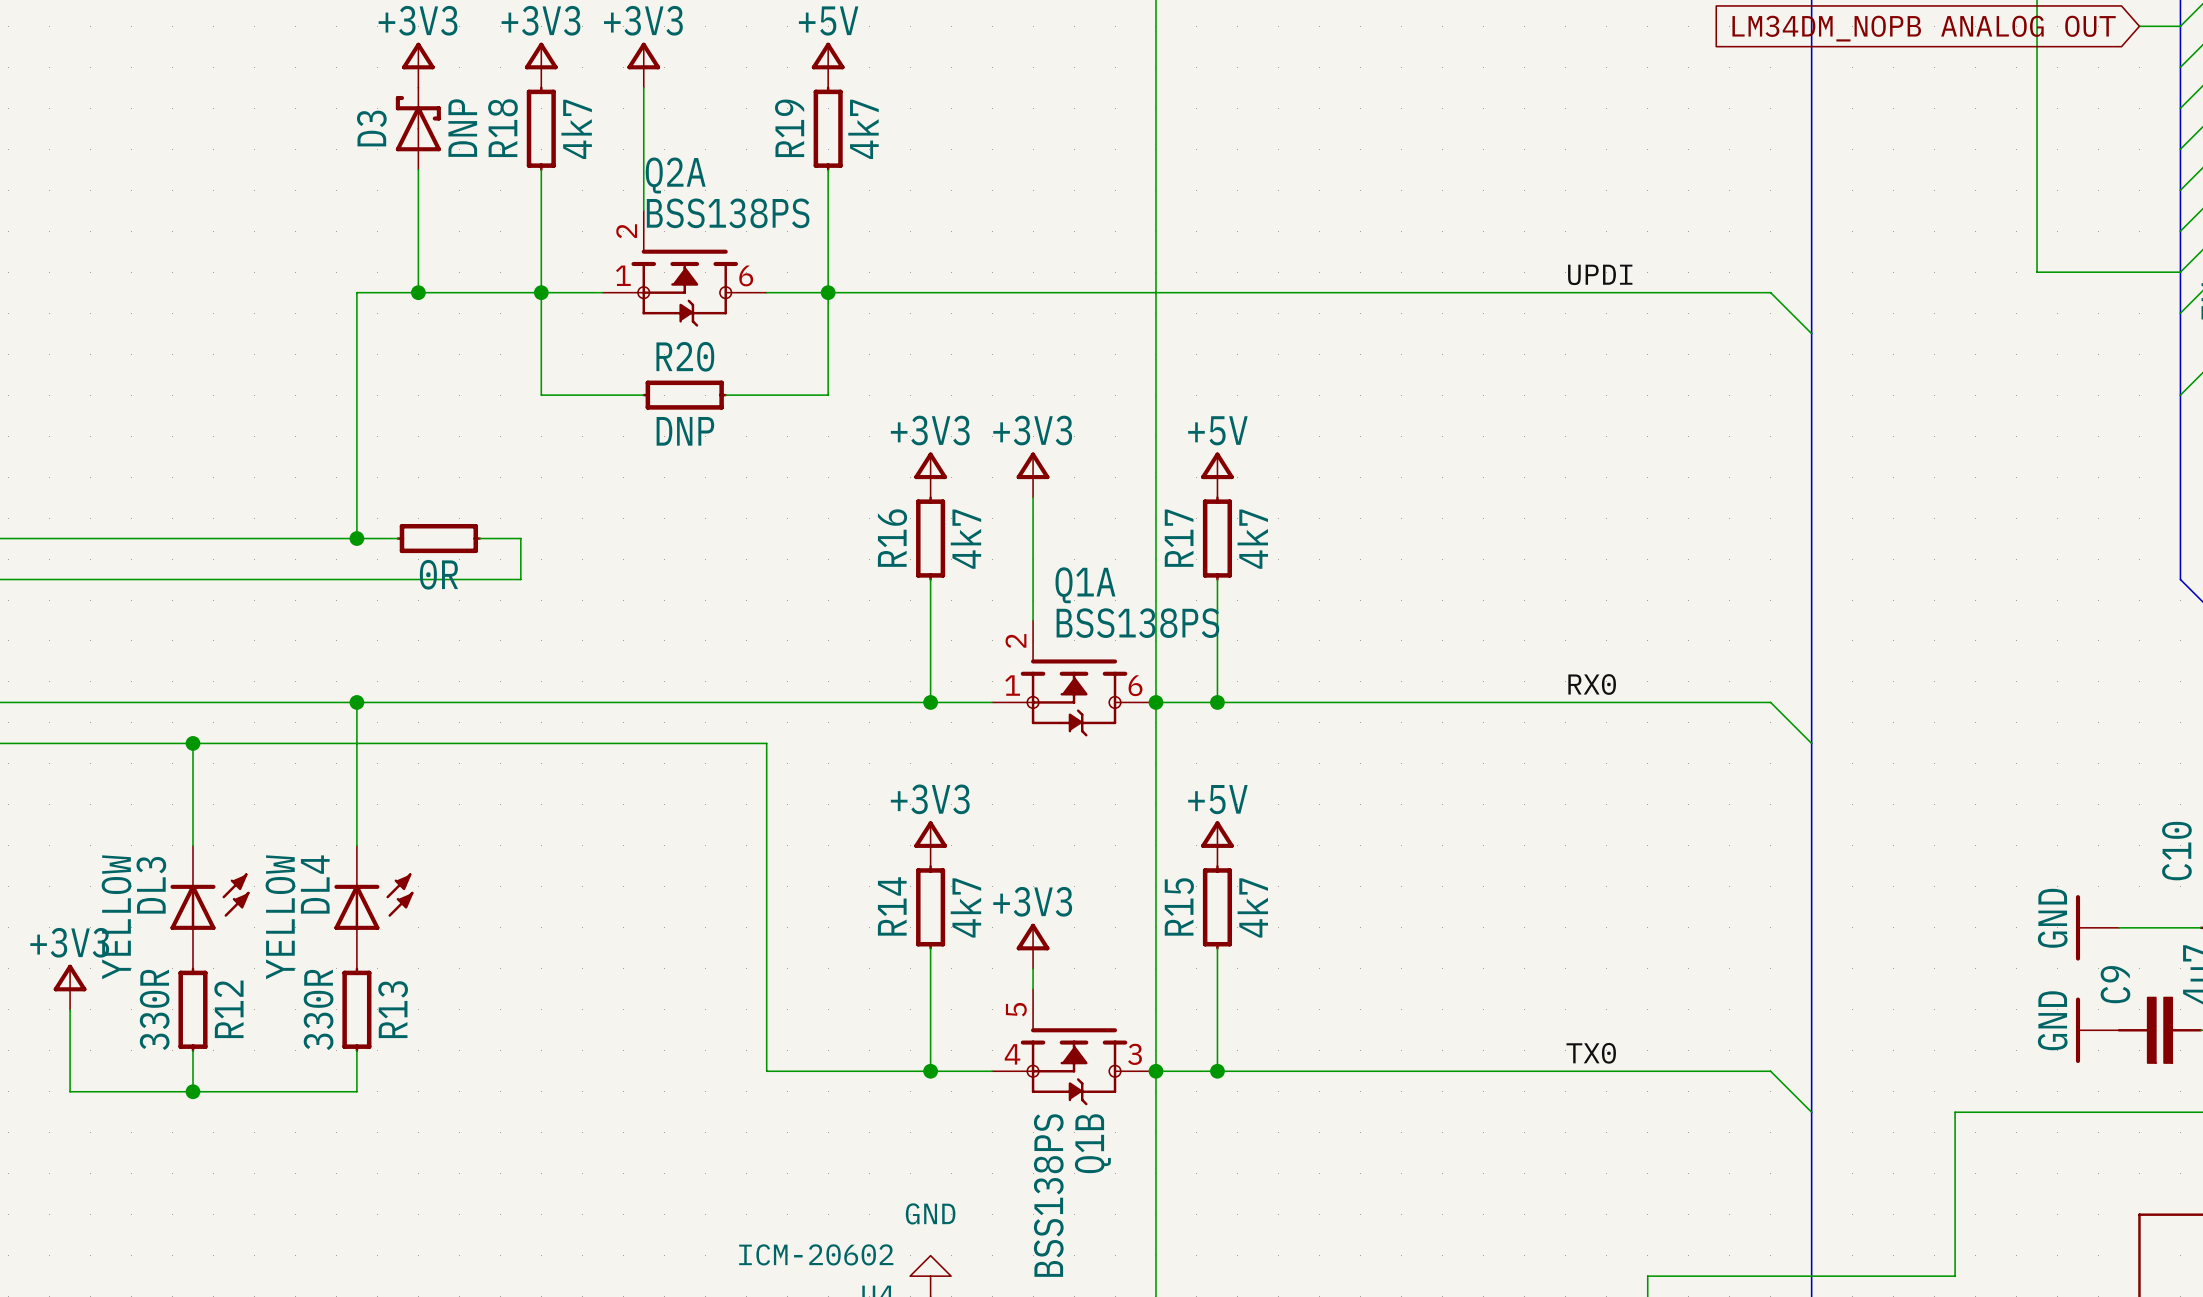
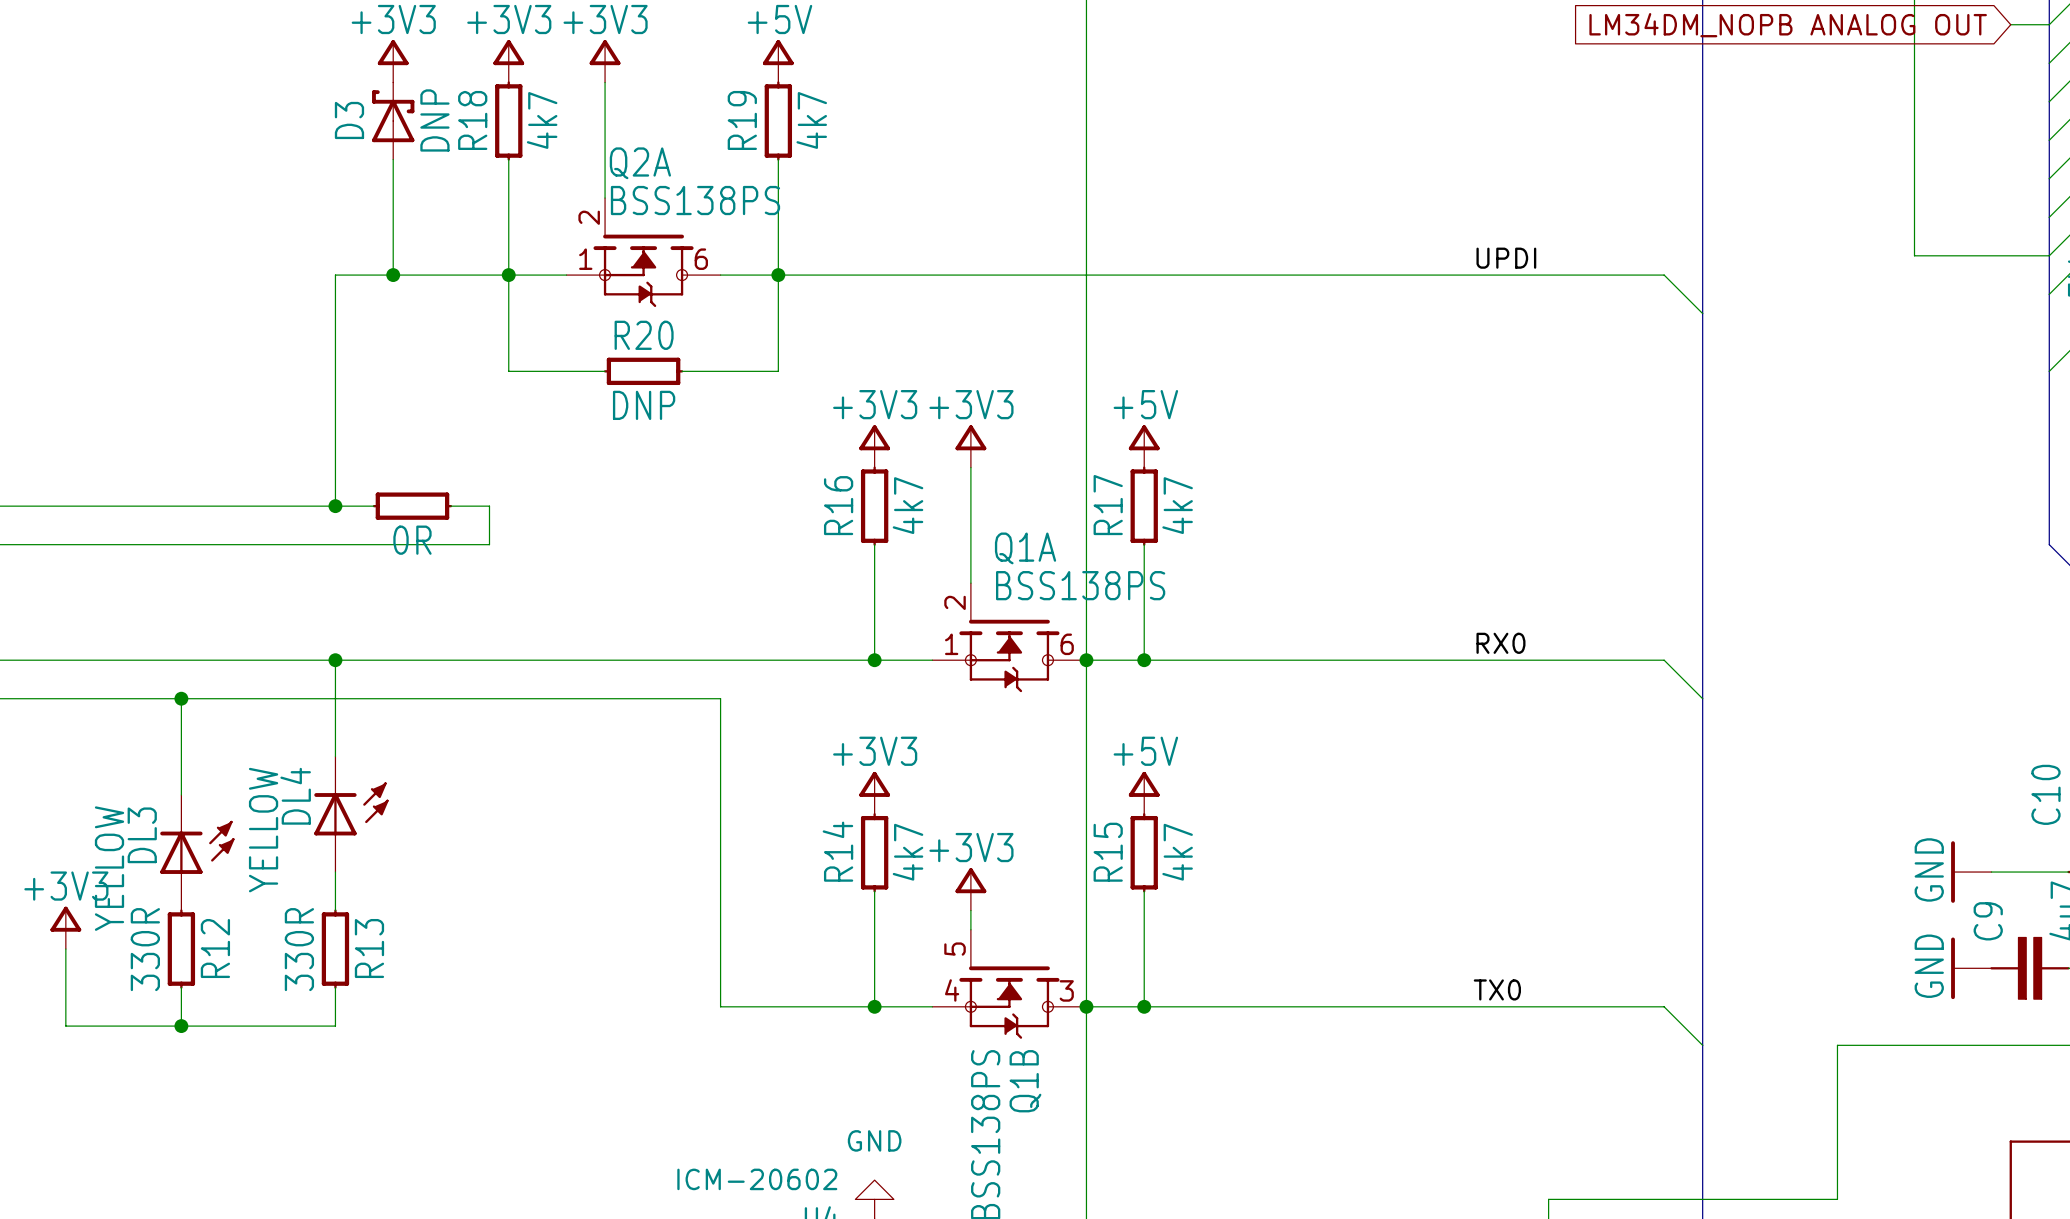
DL4 position: (373, 907) -> (351, 814)

